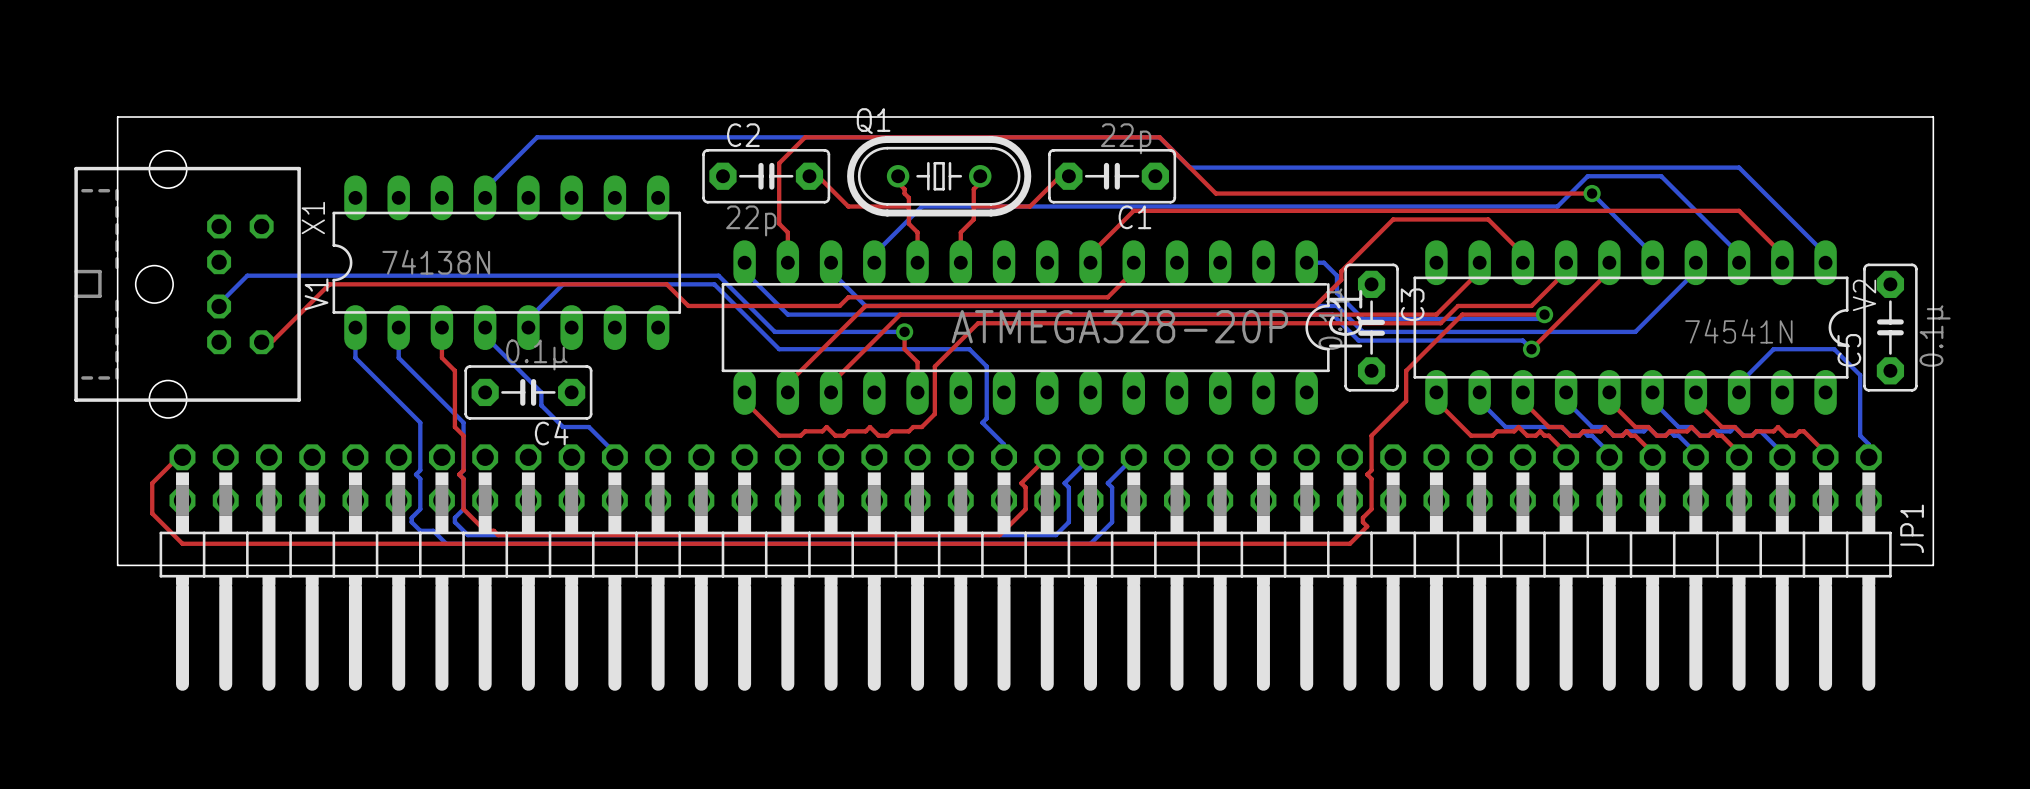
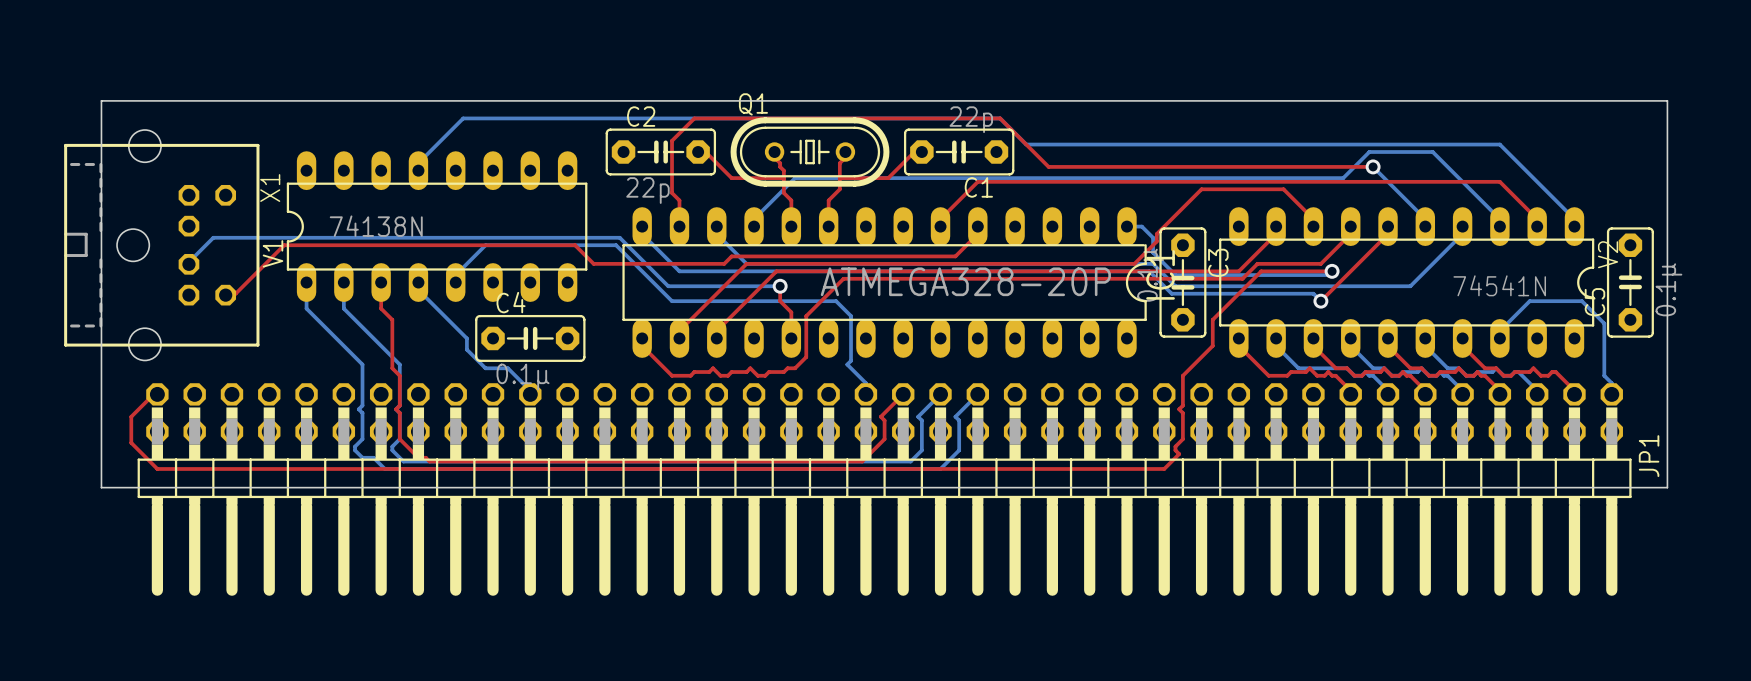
C4 rotation: 0° (528, 392) -> 180° (530, 338)
C4 position: (528, 392) -> (530, 338)

